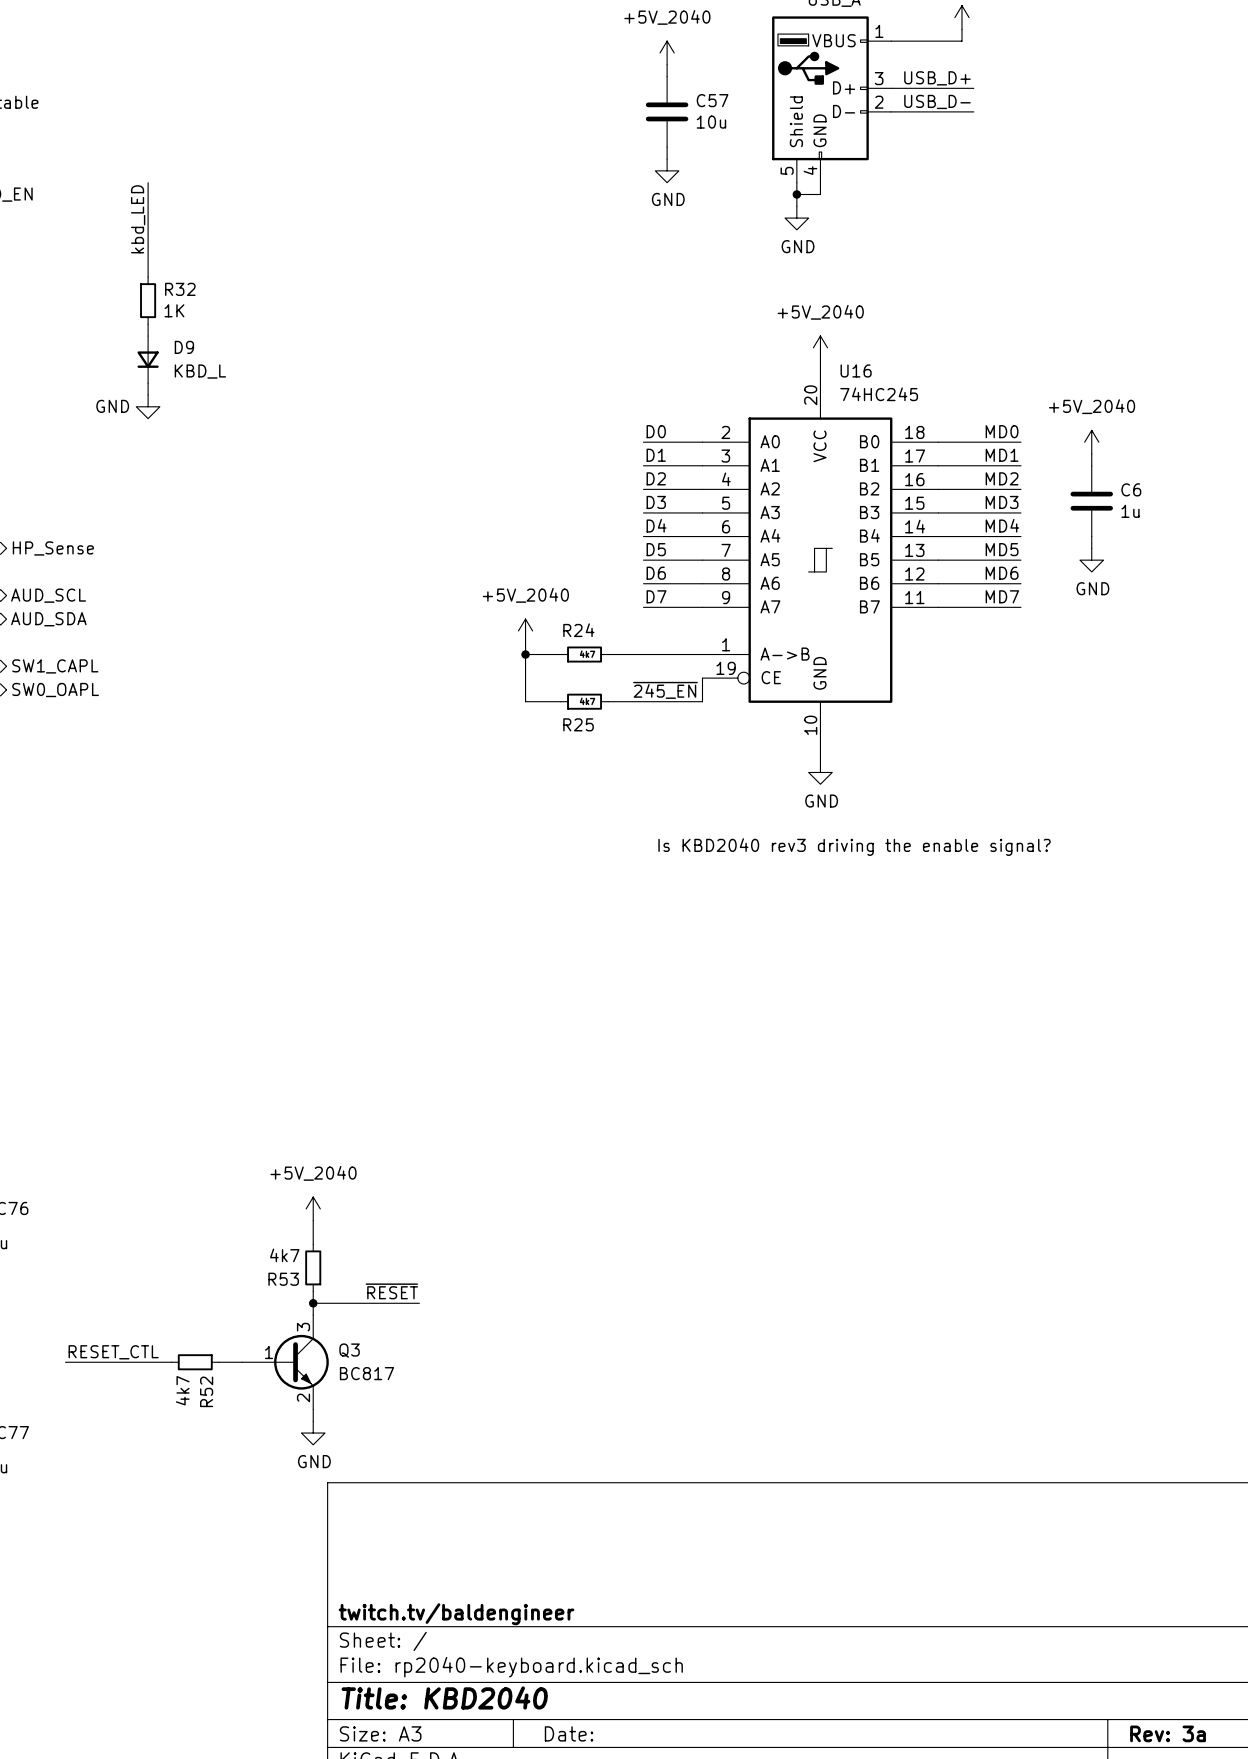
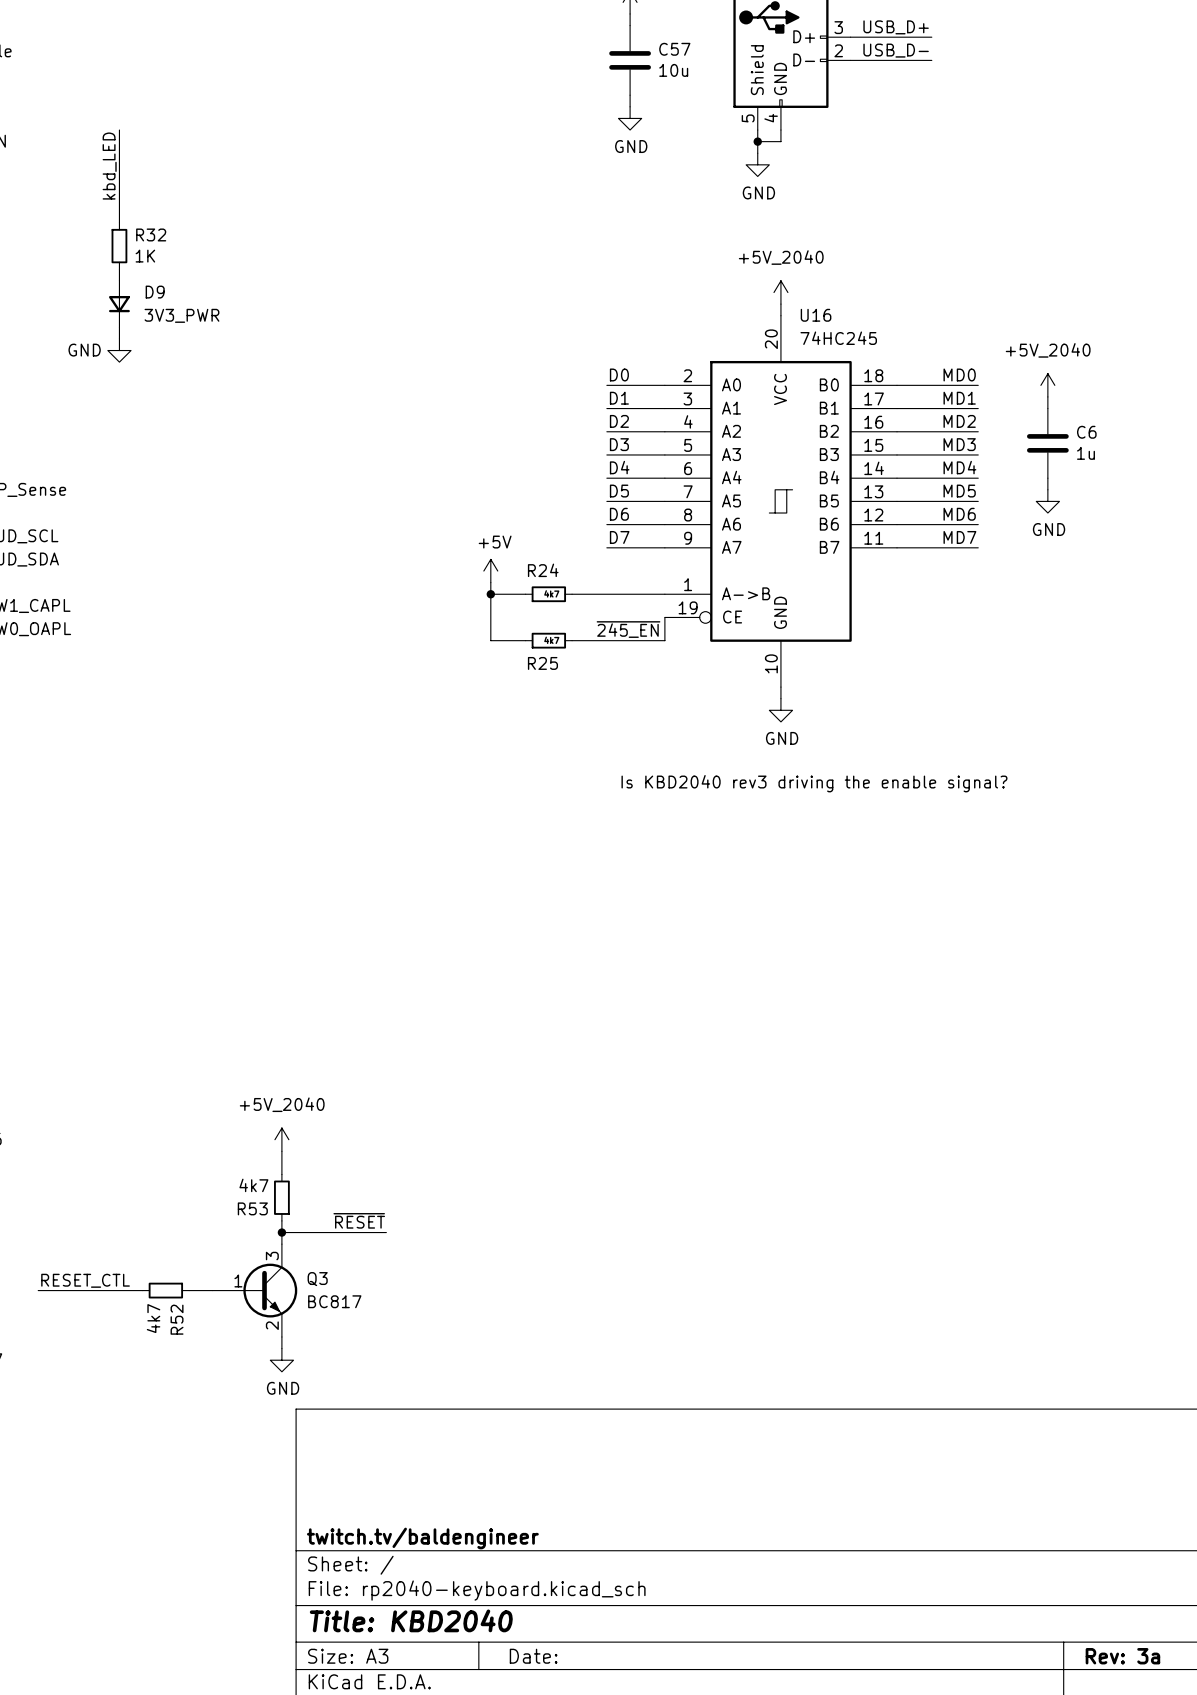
D9 value: KBD_L (200, 371) -> 3V3_PWR (181, 315)
power symbol: +5V_2040 (525, 630) -> +5V (490, 571)

